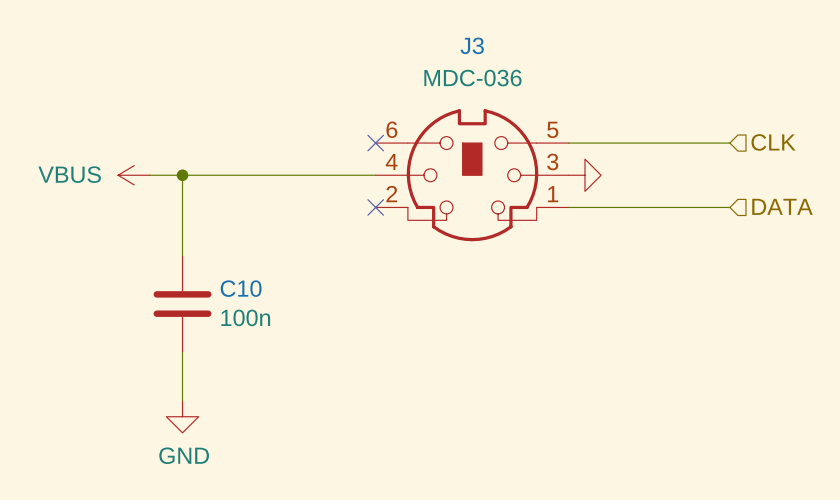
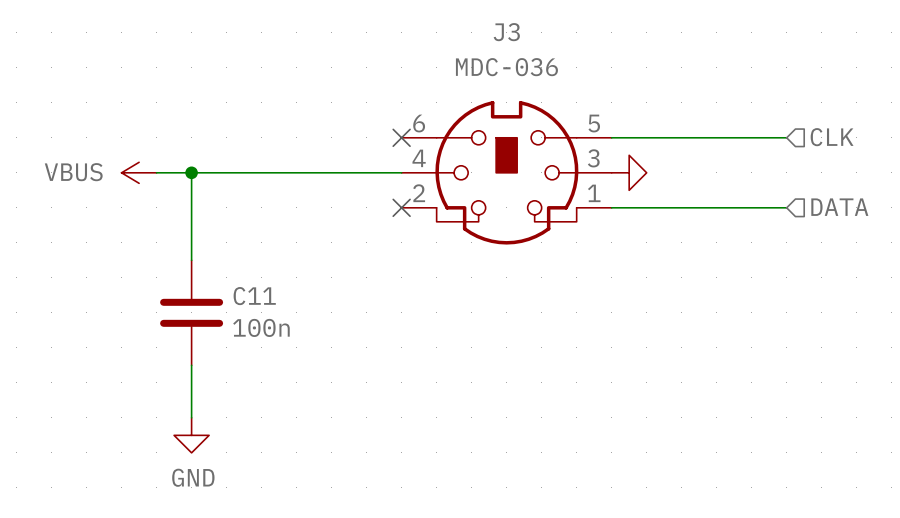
C10 name: C10 (241, 288) -> C11 (254, 296)

